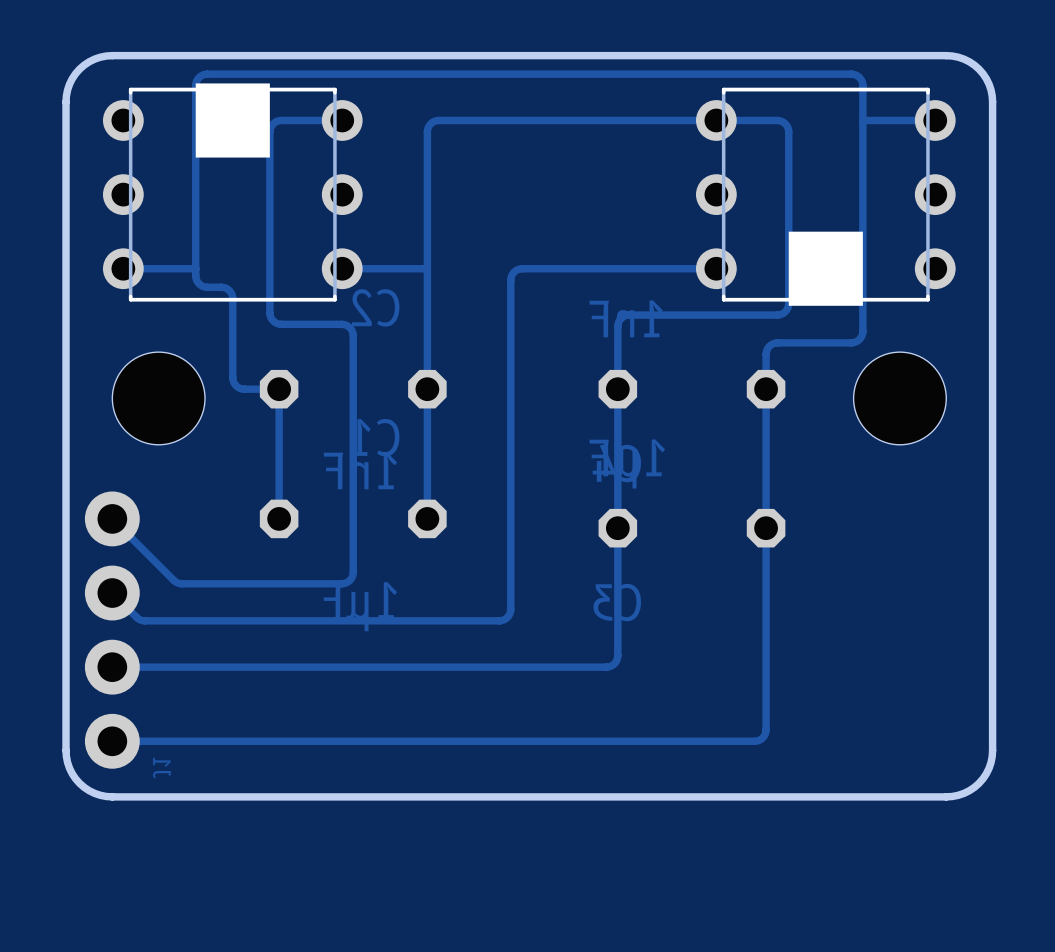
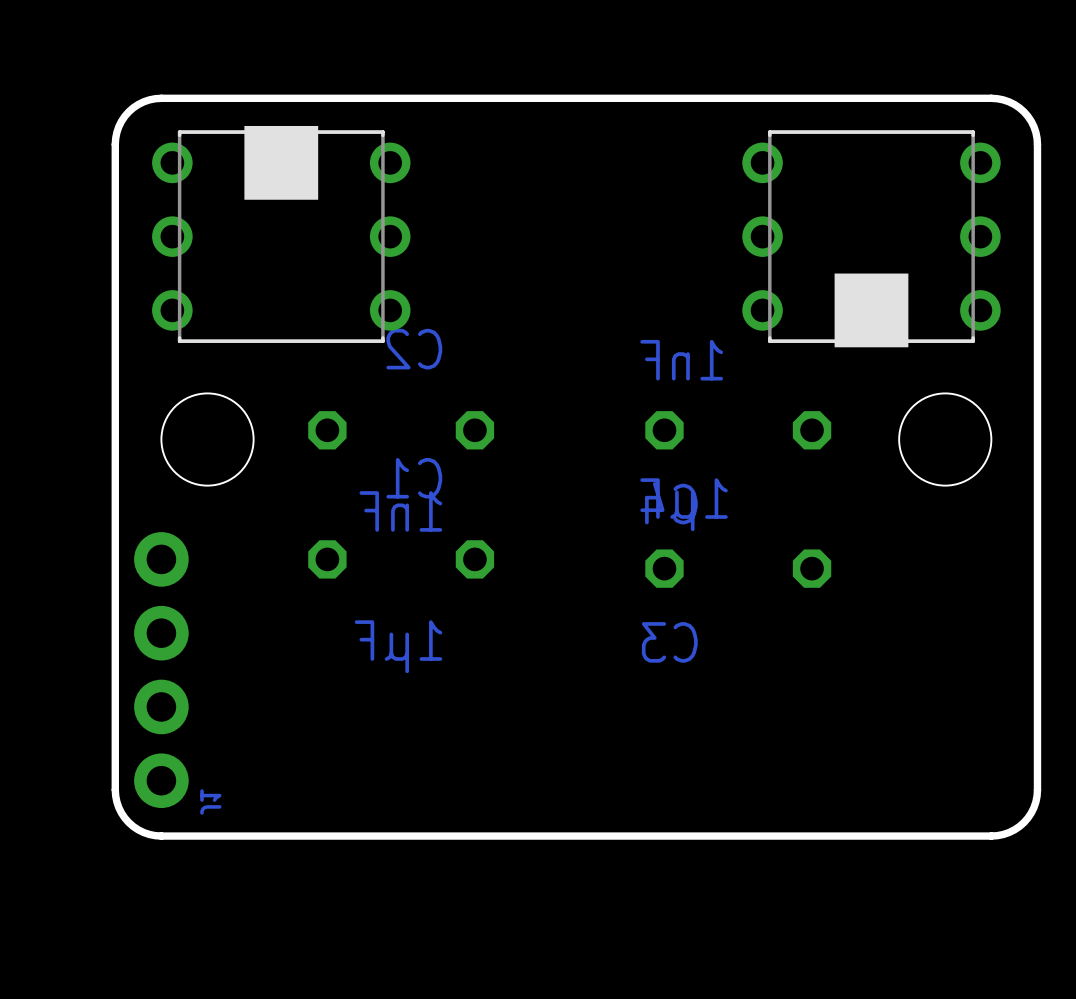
track: (342, 120) (279, 120) (274, 122) (270, 127) (269, 312) (272, 319) (278, 323) (343, 324) (348, 326) (352, 332) (353, 572) (351, 577) (347, 582) (341, 583) (179, 583) (112, 518) -> none
track: (935, 120) (862, 120) -> none
track: (195, 268) (123, 268) -> none
track: (427, 268) (342, 268) -> none
track: (716, 268) (522, 268) (516, 270) (512, 274) (510, 280) (510, 609) (509, 615) (504, 619) (499, 620) (143, 620) (136, 617) (112, 593) -> none
track: (279, 518) (279, 389) (242, 389) (235, 384) (232, 377) (231, 294) (224, 287) (202, 286) (198, 282) (195, 277) (195, 85) (200, 76) (207, 74) (851, 74) (860, 78) (862, 85) (861, 335) (858, 340) (852, 342) (776, 342) (769, 346) (766, 352) (766, 729) (762, 737) (754, 741) (112, 741) -> none
track: (427, 518) (427, 132) (430, 123) (438, 120) (777, 120) (785, 123) (788, 132) (788, 303) (786, 310) (777, 315) (627, 315) (621, 318) (618, 323) (617, 655) (613, 664) (606, 667) (112, 667) -> none

